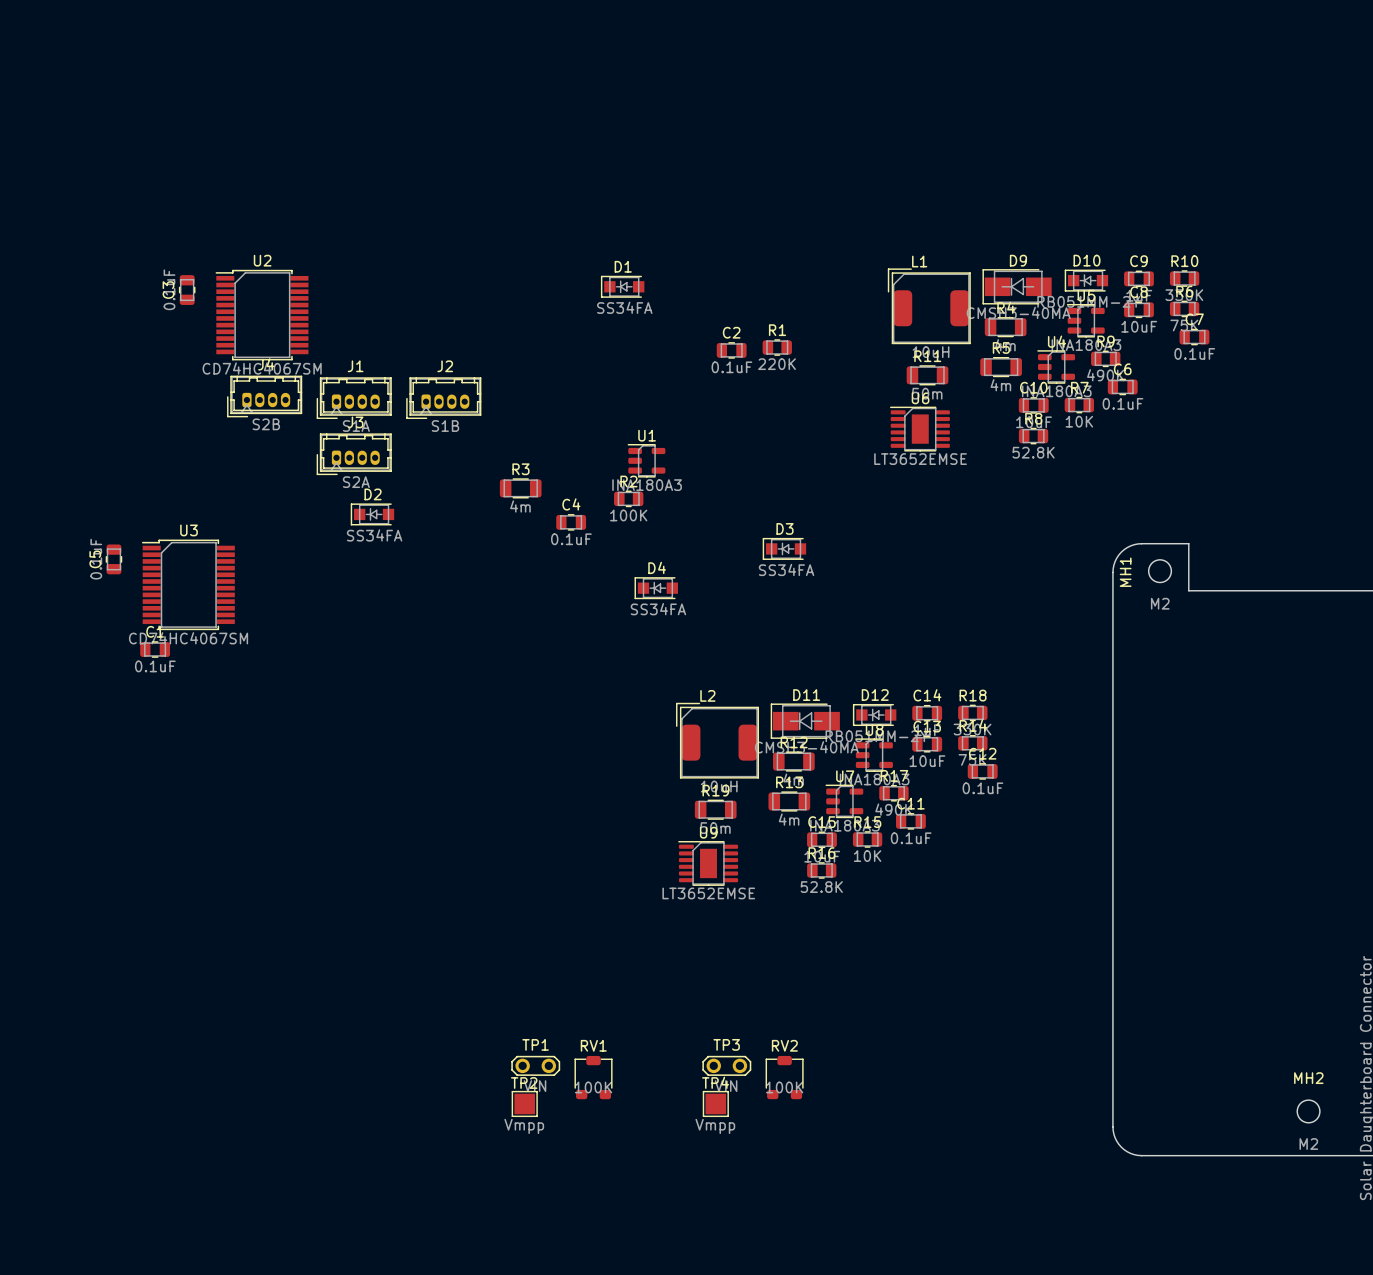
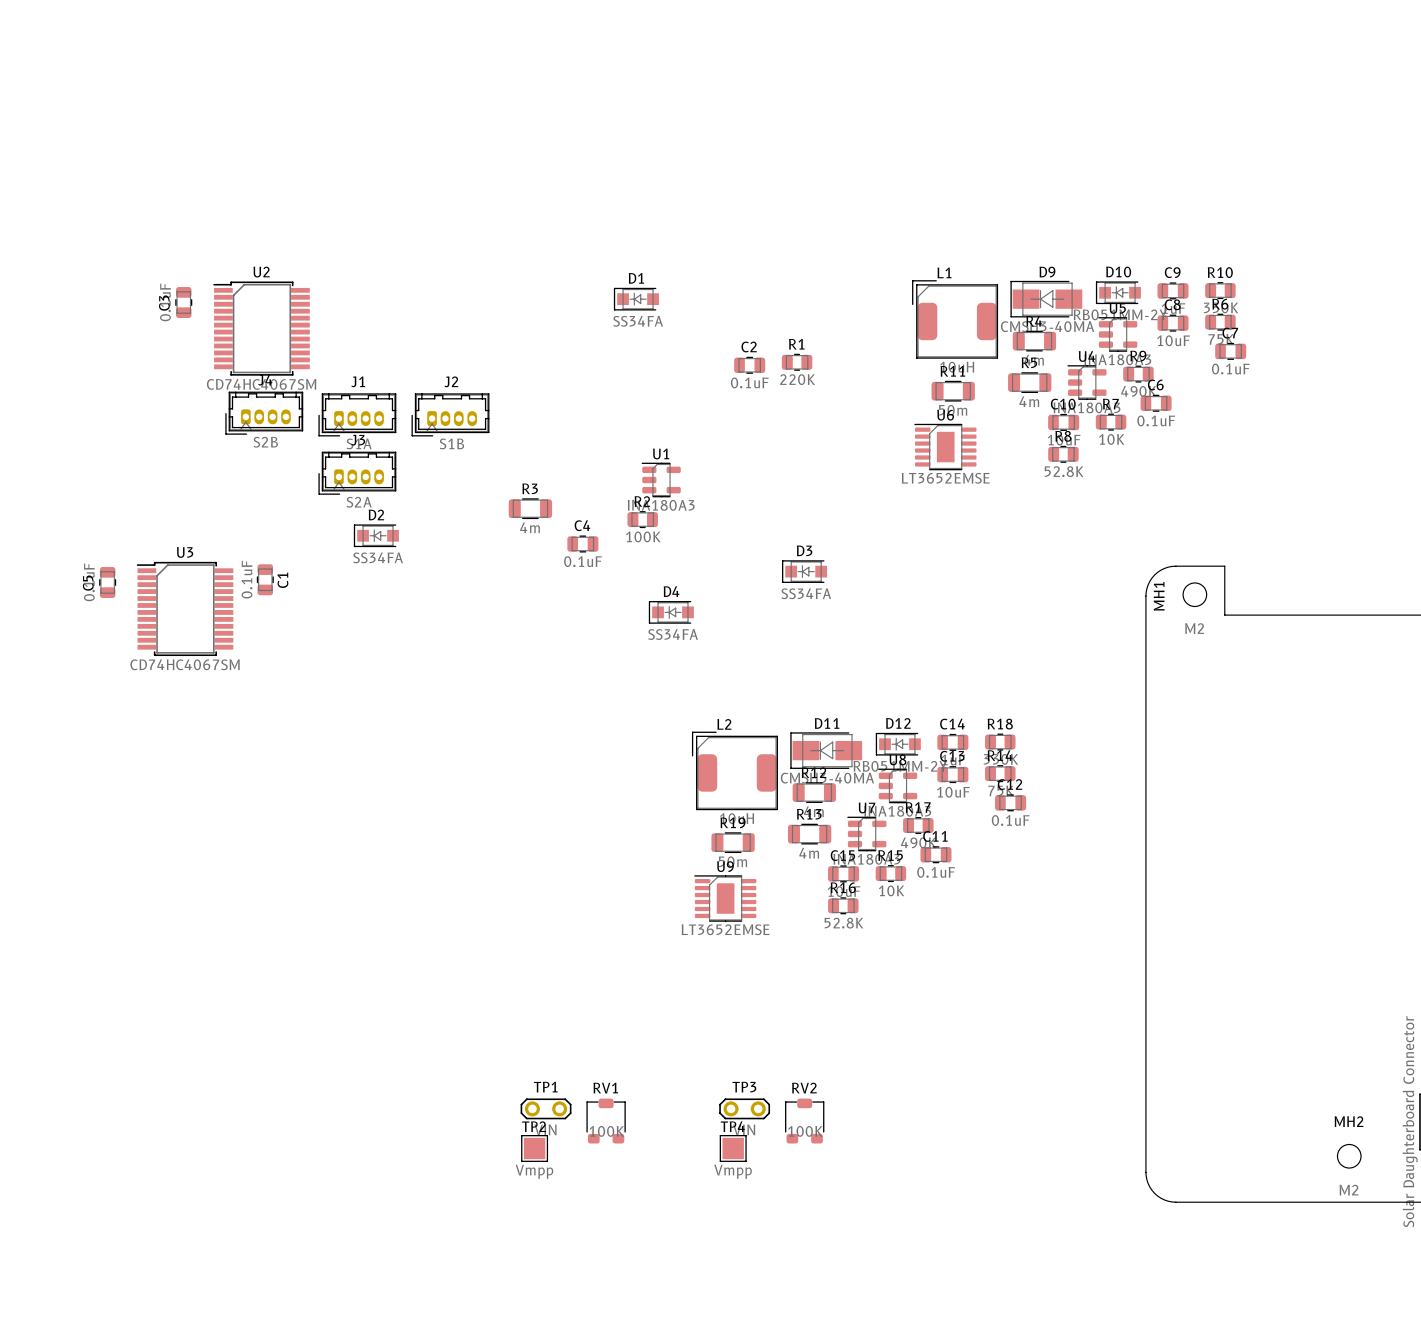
C1 rotation: 0° (155, 649) -> 90° clockwise (265, 579)
C1 position: (155, 649) -> (265, 579)

